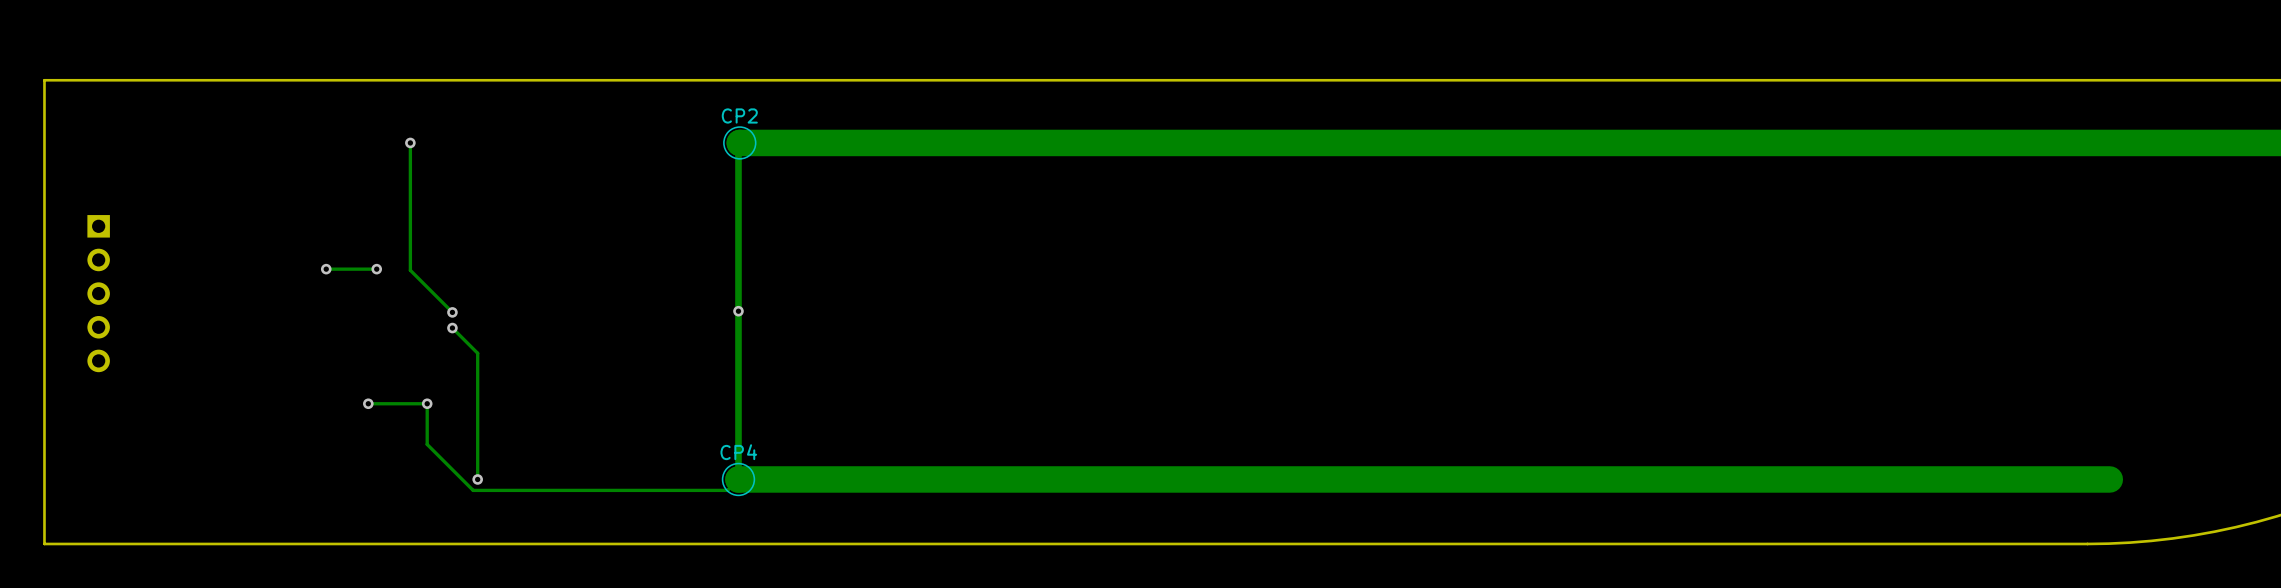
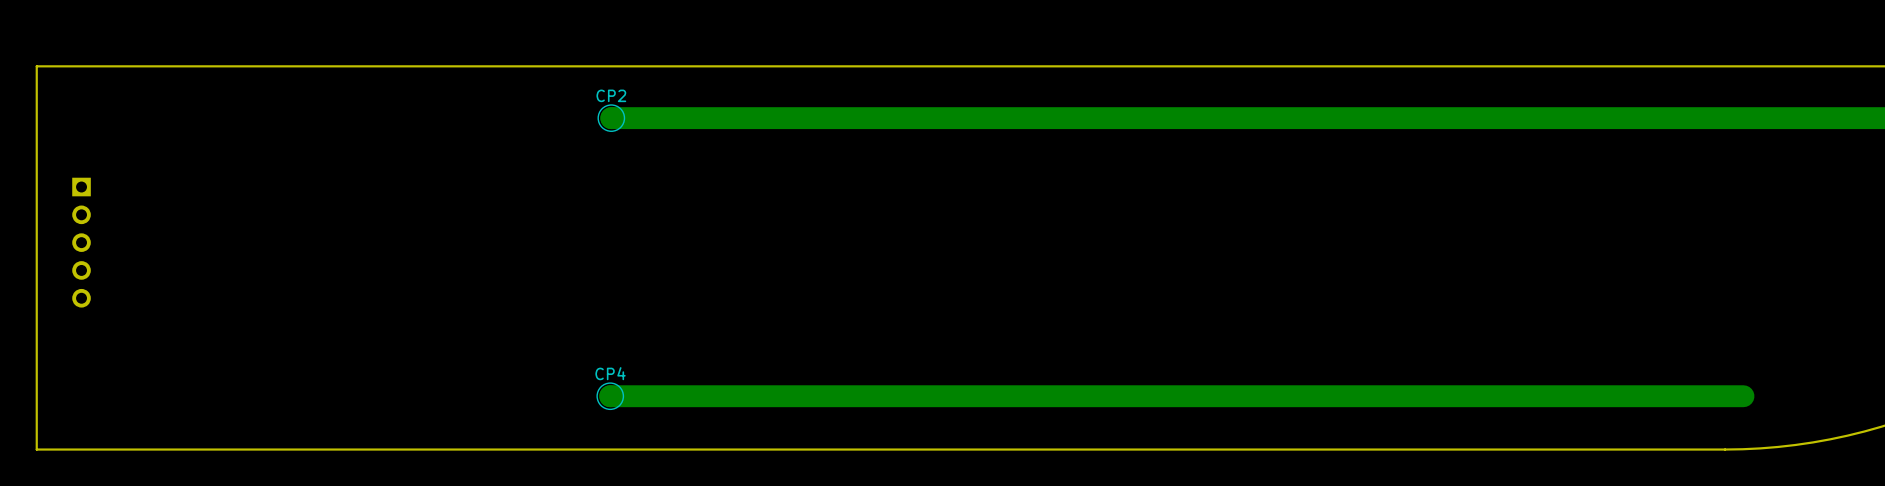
track: (410, 142) (410, 270) (452, 312) -> none
via: (410, 142) -> none
track: (739, 142) (738, 479) (727, 490) (473, 490) (427, 444) (427, 403) (368, 403) -> none
via: (326, 269) -> none
track: (376, 269) (326, 269) -> none
via: (376, 269) -> none
via: (738, 311) -> none
via: (452, 312) -> none
track: (452, 328) (477, 353) (477, 479) -> none
via: (452, 328) -> none
via: (368, 403) -> none
via: (427, 403) -> none
via: (477, 479) -> none

